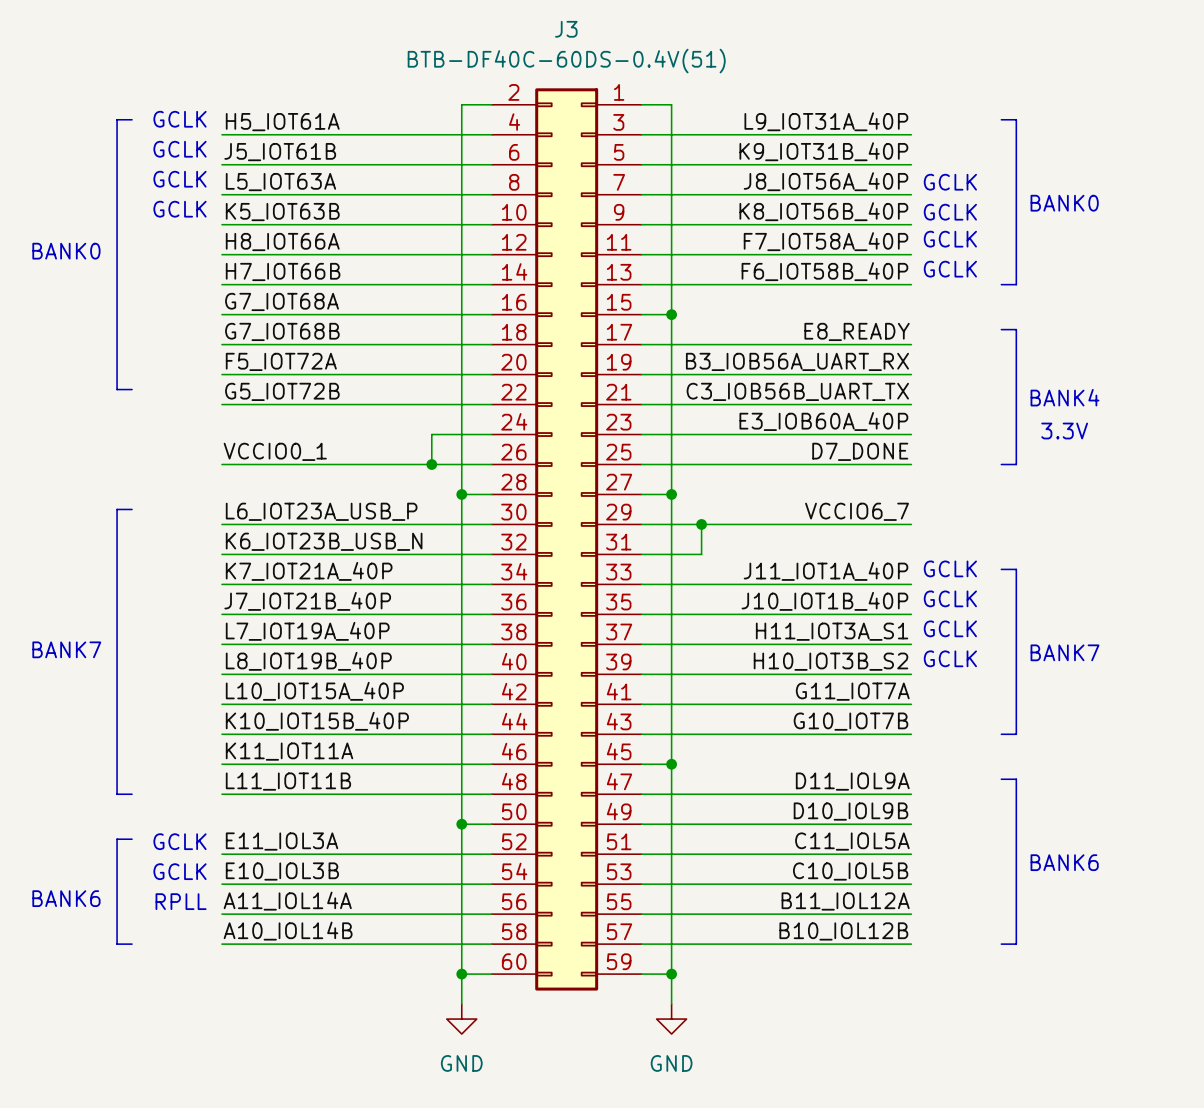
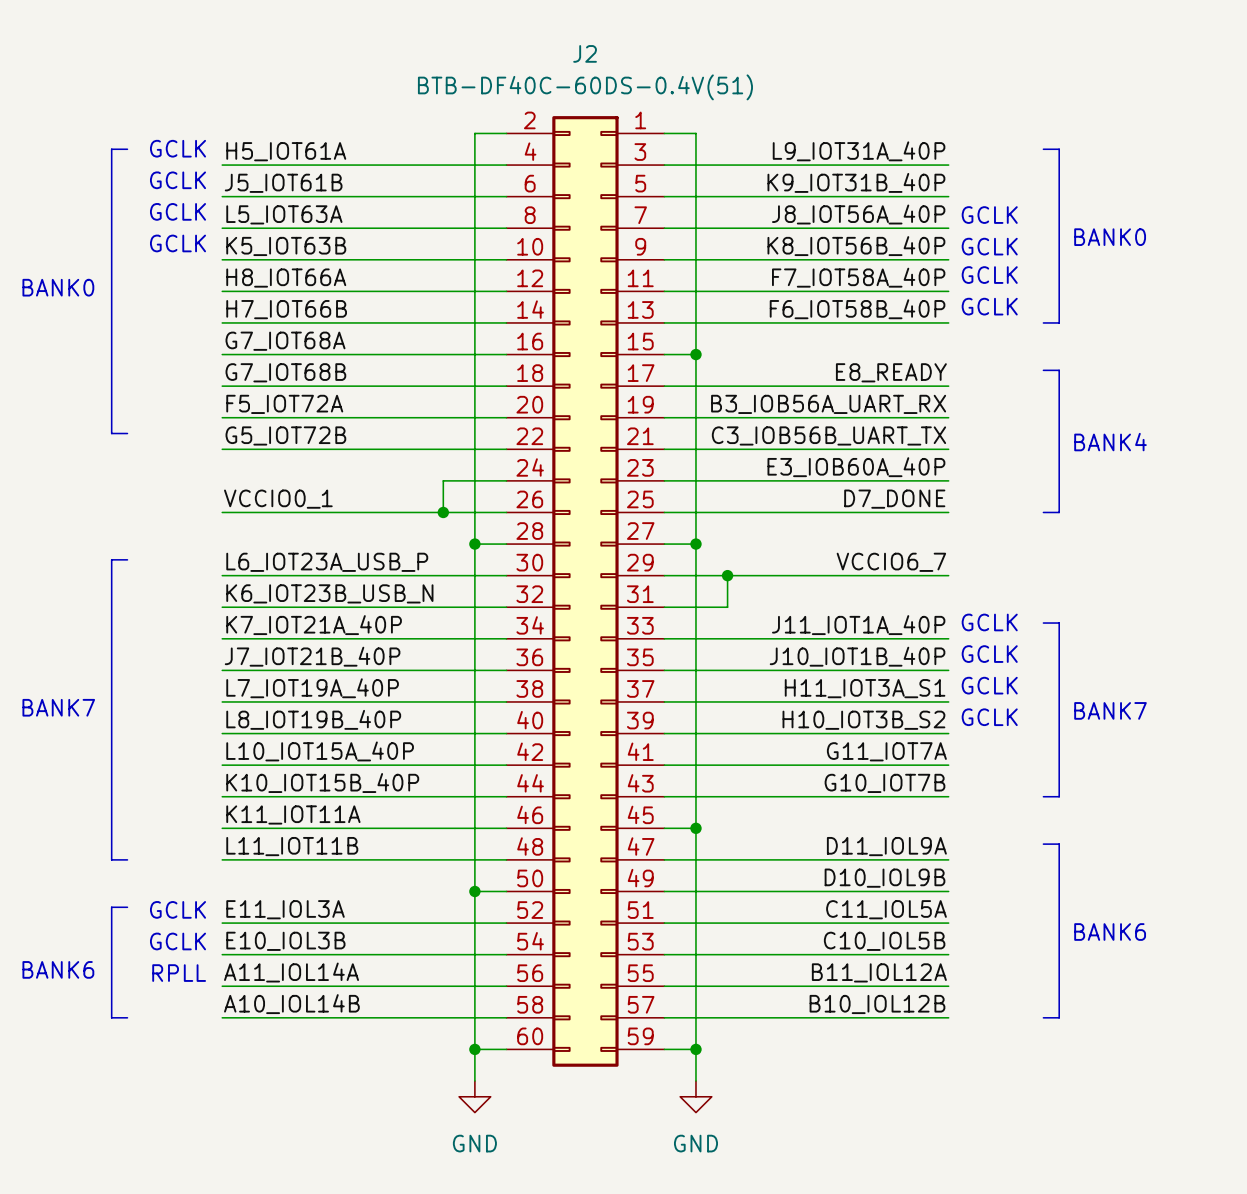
J3 name: J3 (566, 29) -> J2 (585, 53)
text: 3.3V (1064, 431) -> none

